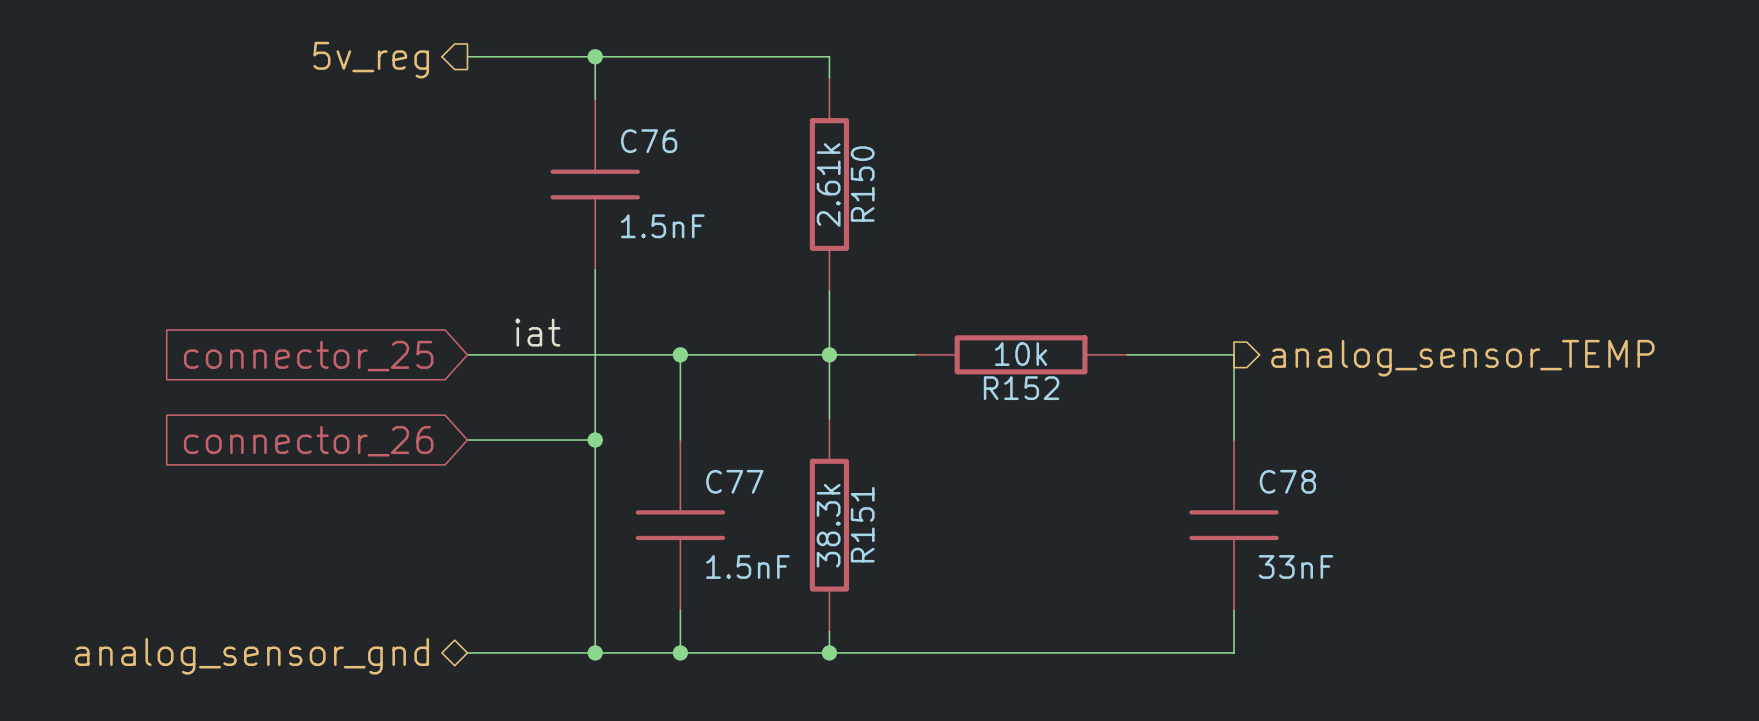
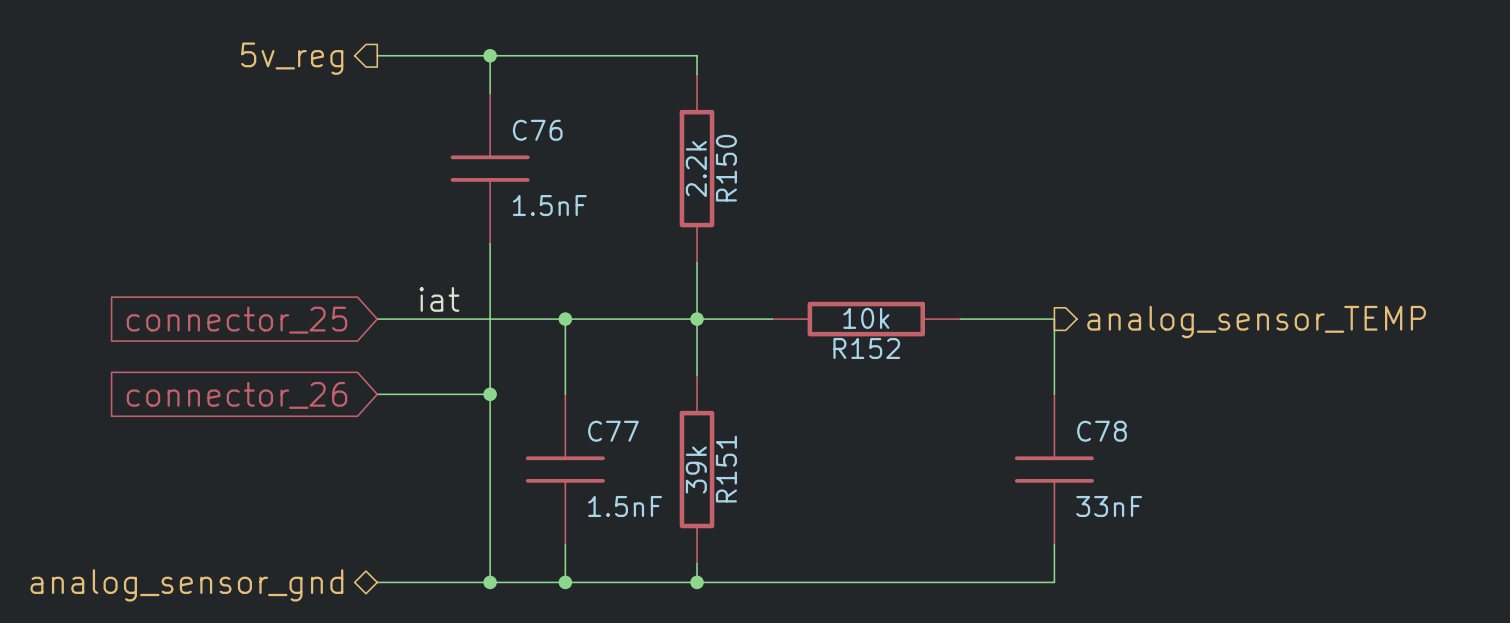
R150 value: 2.61k (828, 185) -> 2.2k (696, 169)
R151 value: 38.3k (828, 525) -> 39k (696, 470)

